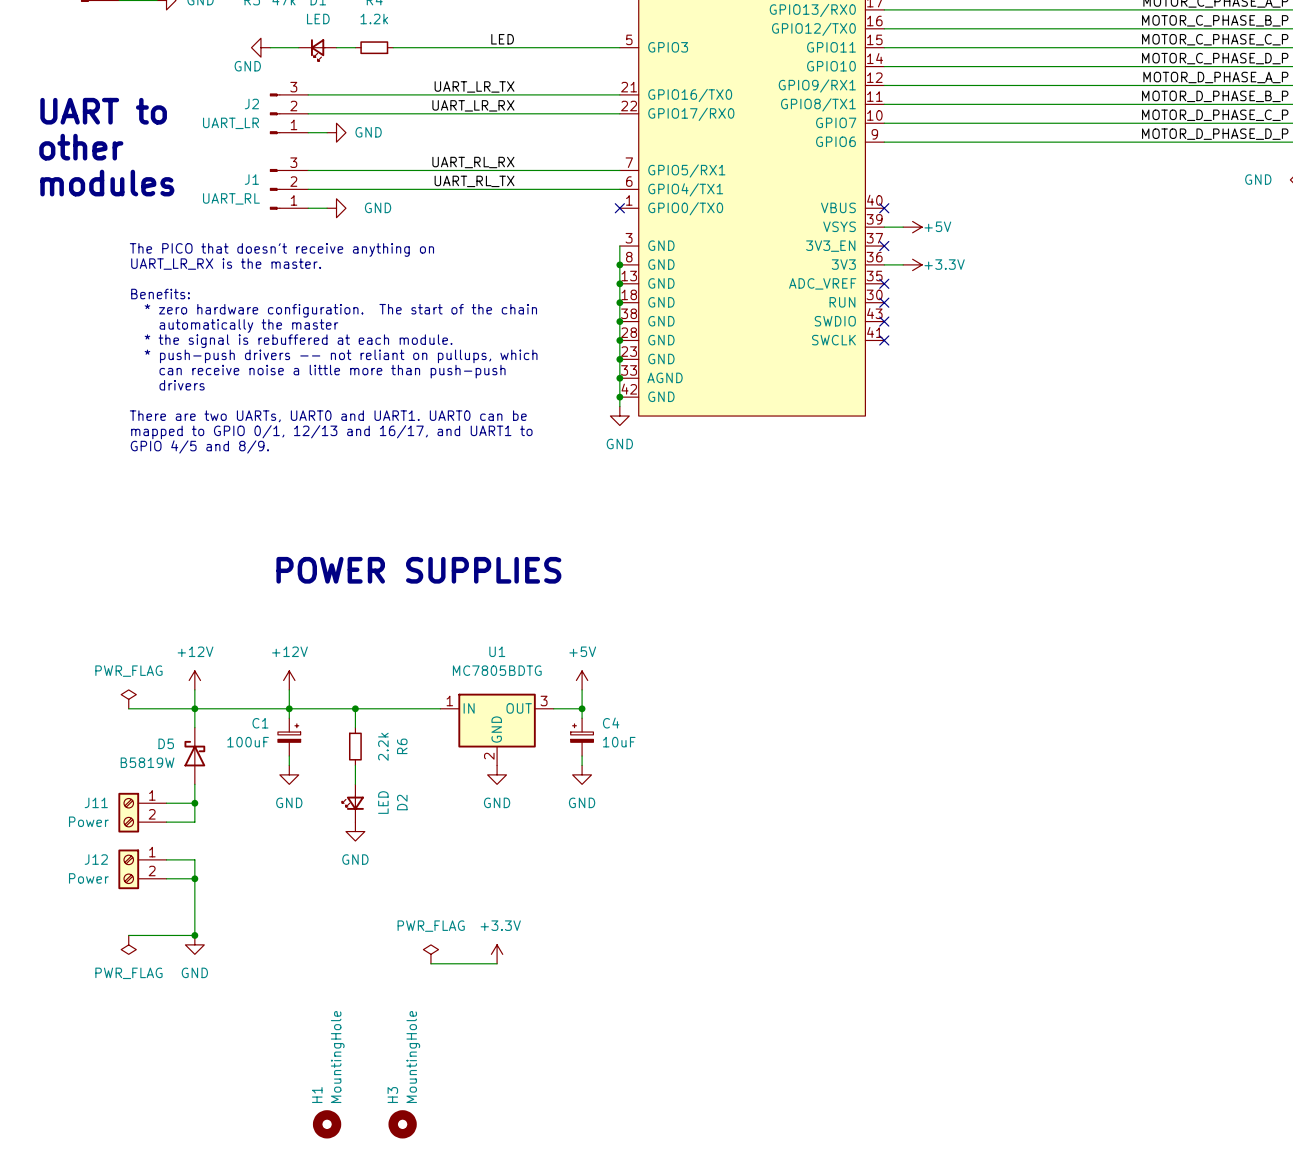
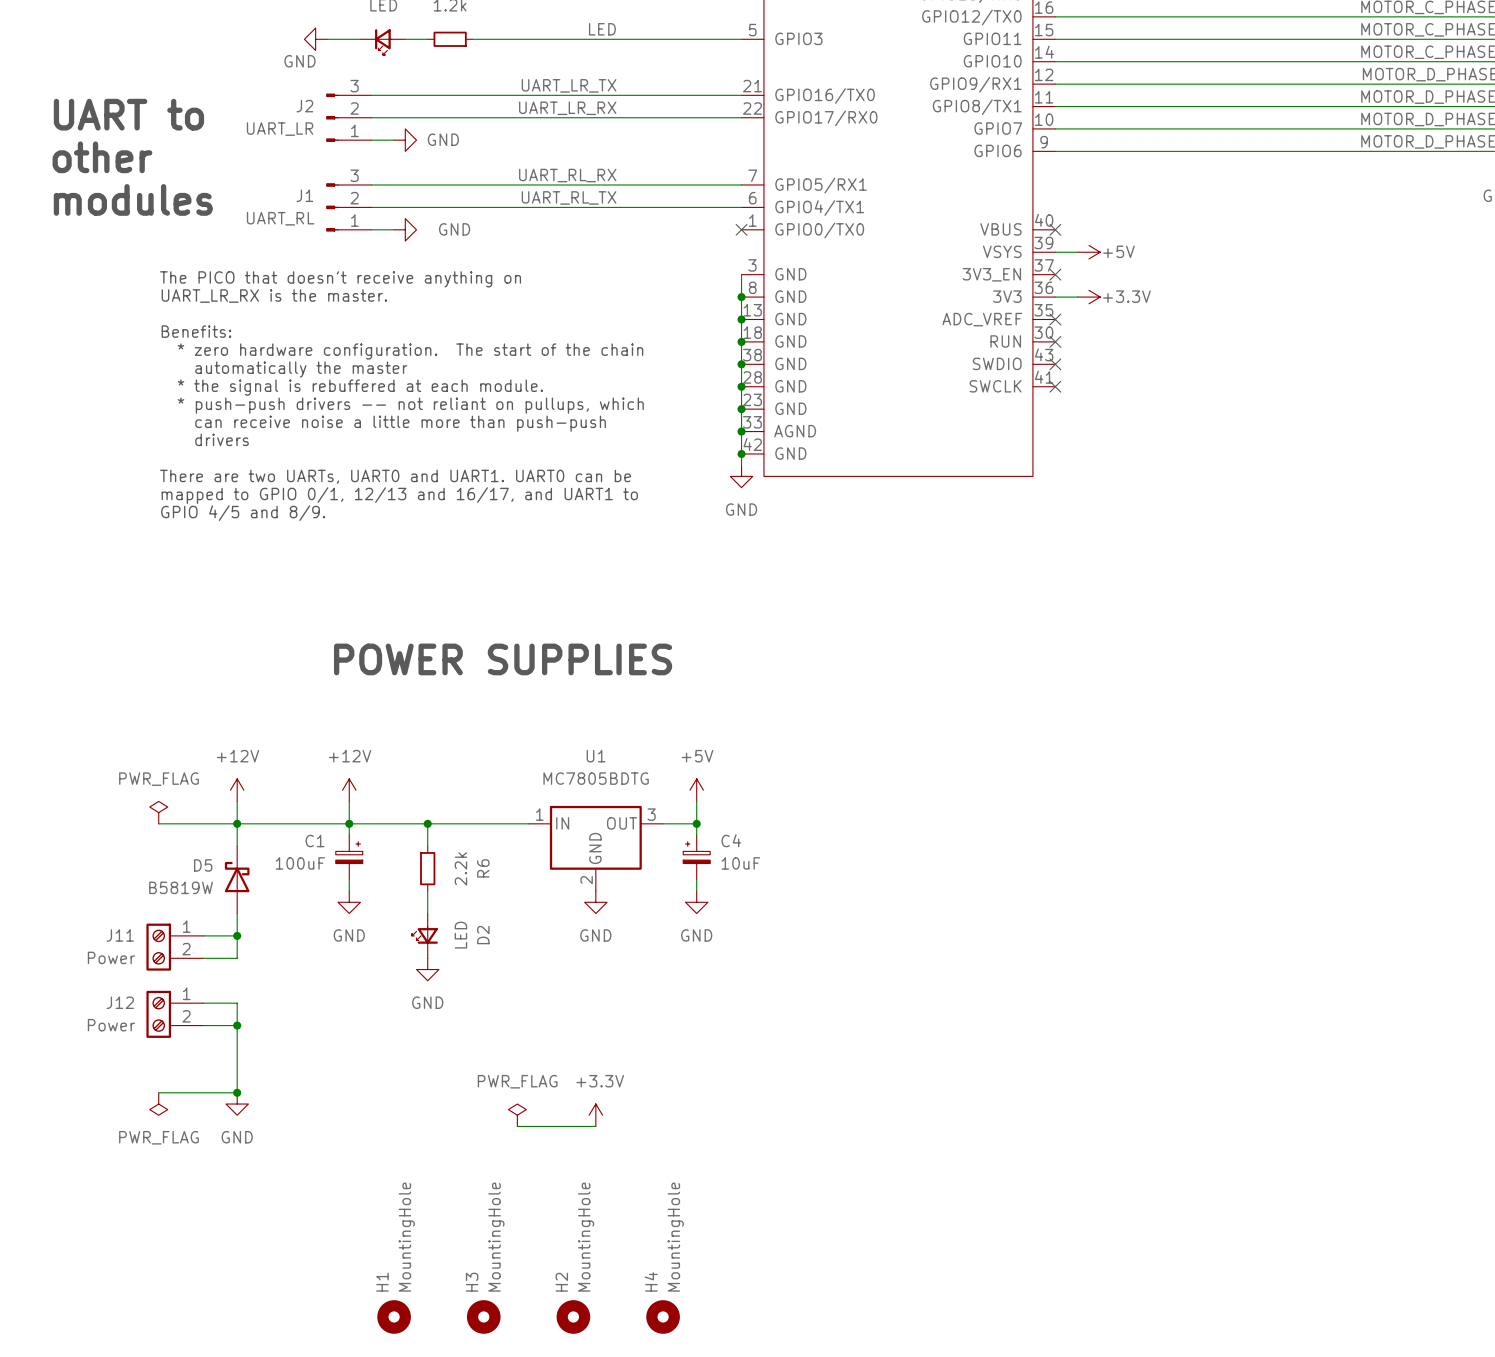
H2: none -> MountingHole (573, 1316)
H4: none -> MountingHole (663, 1316)

